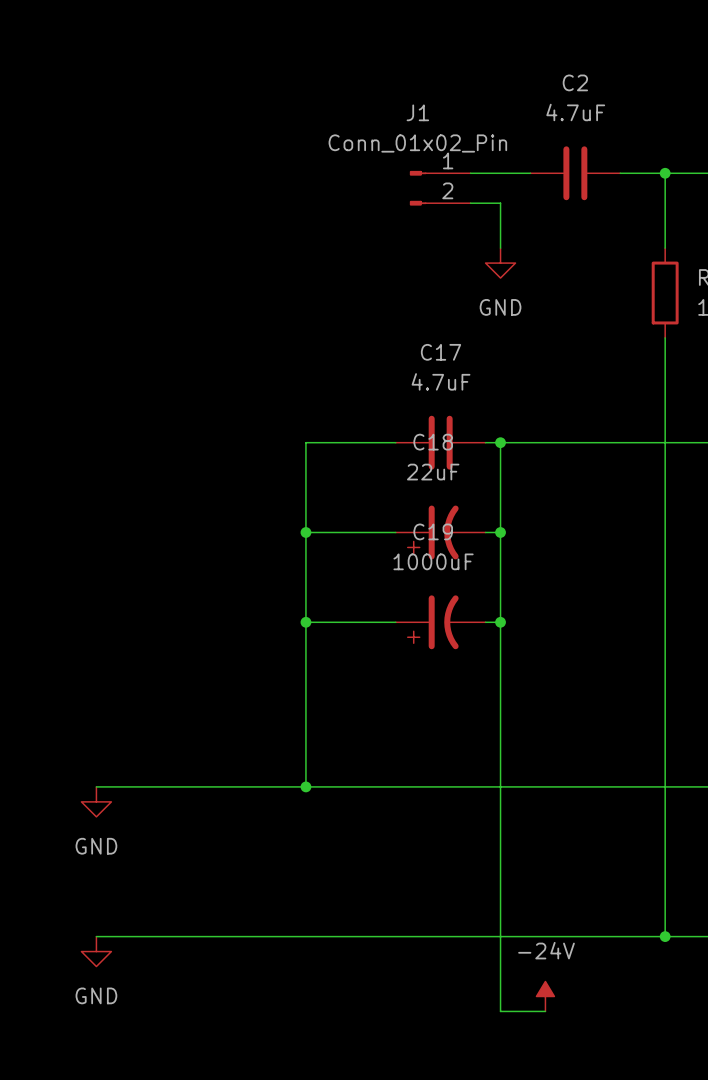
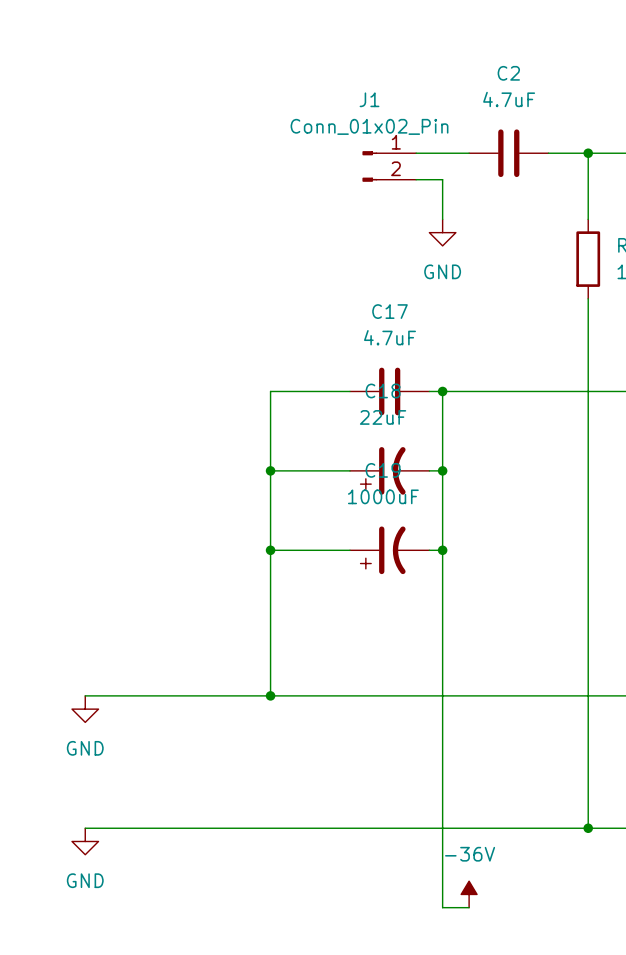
power symbol: -24V (545, 996) -> none
wire: (500, 1011) (545, 1011) -> (442, 894) (442, 907) (469, 907)
power symbol: none -> -36V (469, 894)

